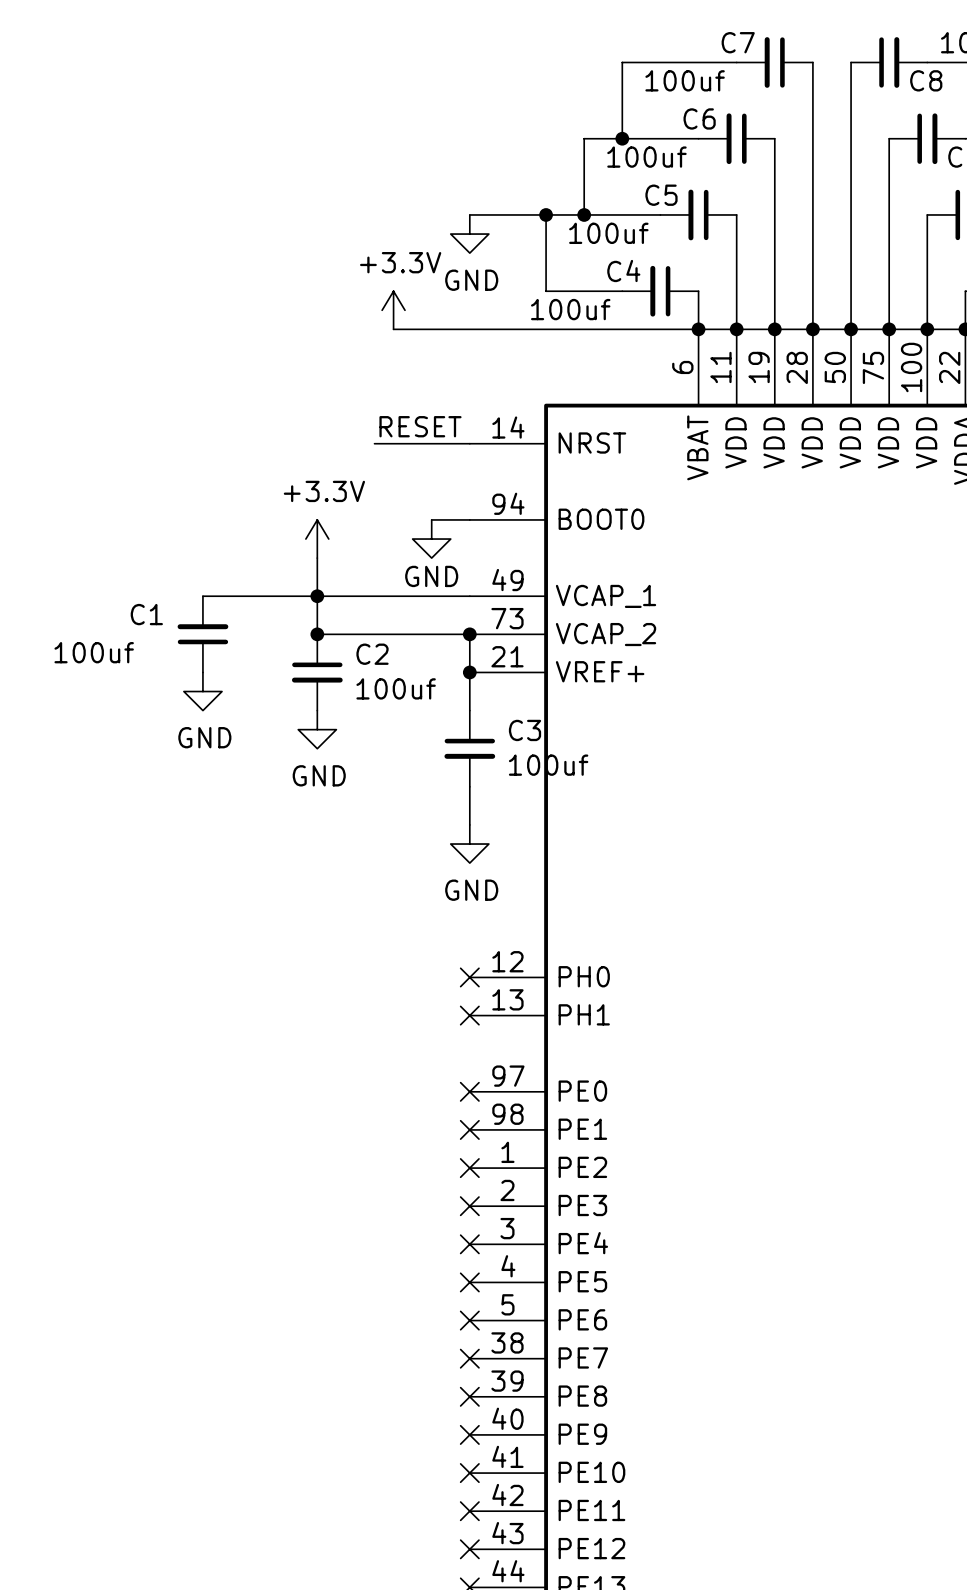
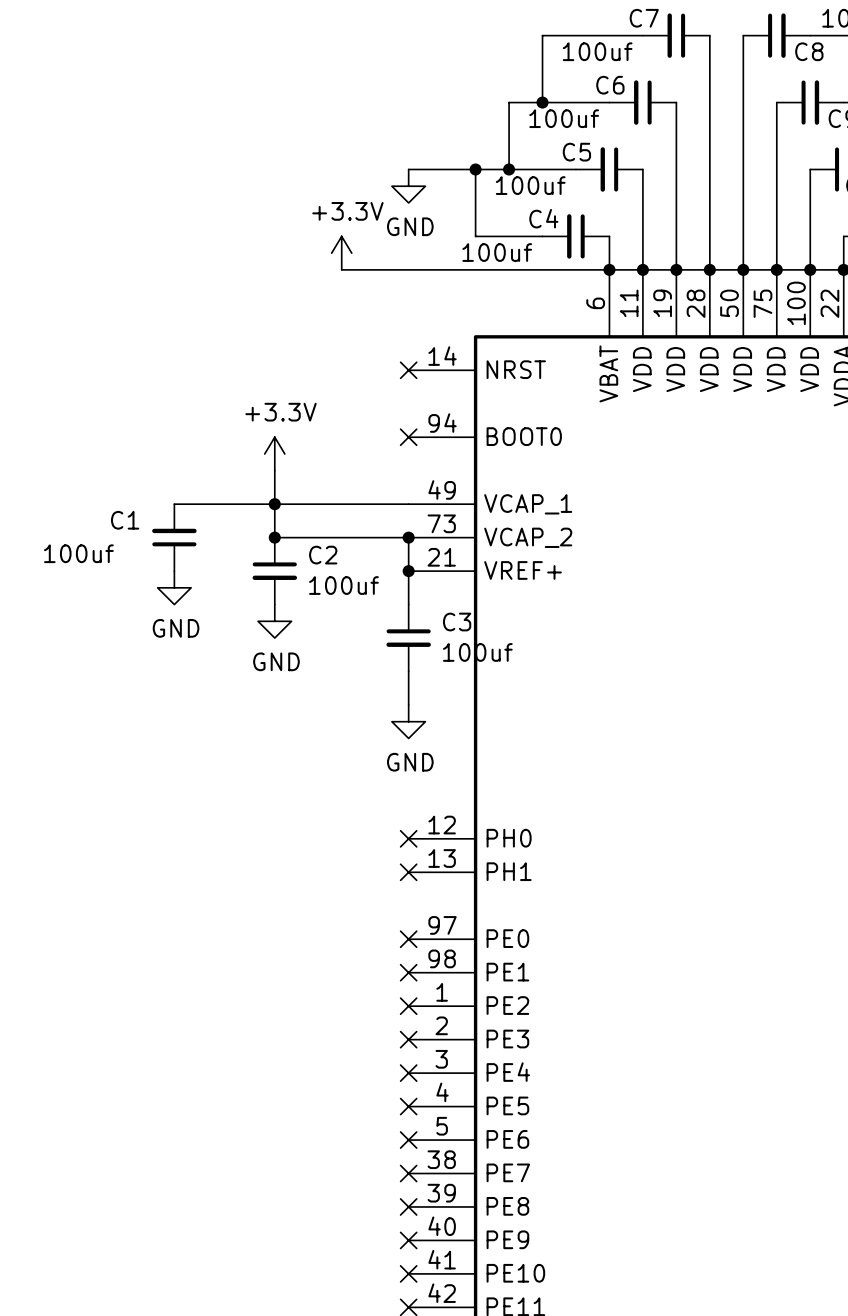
label: RESET (420, 426) -> none
wire: (374, 443) (469, 443) -> none
no-connect mark: none -> (408, 370)
wire: (431, 519) (469, 519) -> none
no-connect mark: none -> (408, 437)
power symbol: GND (431, 539) -> none

